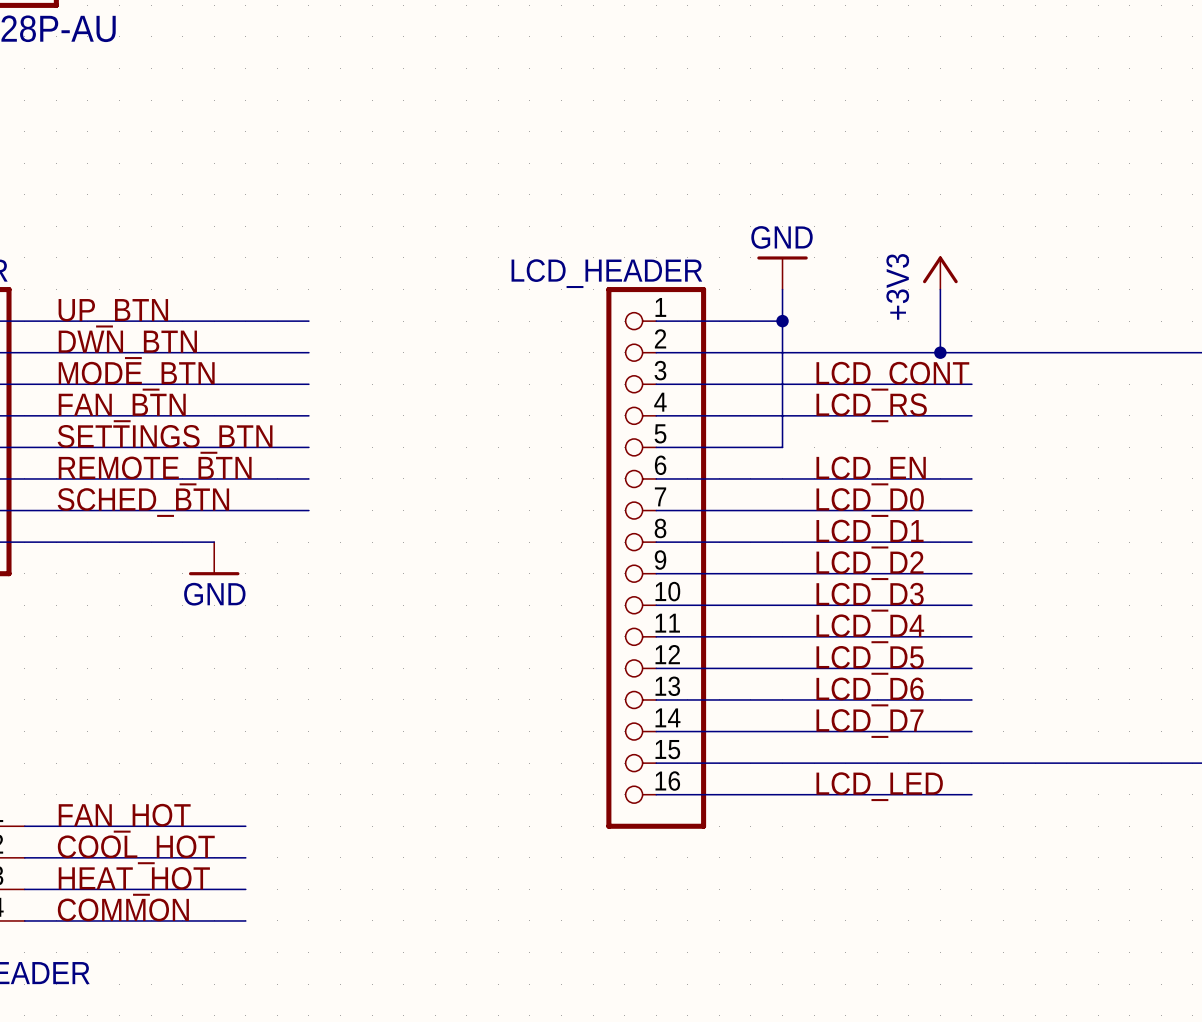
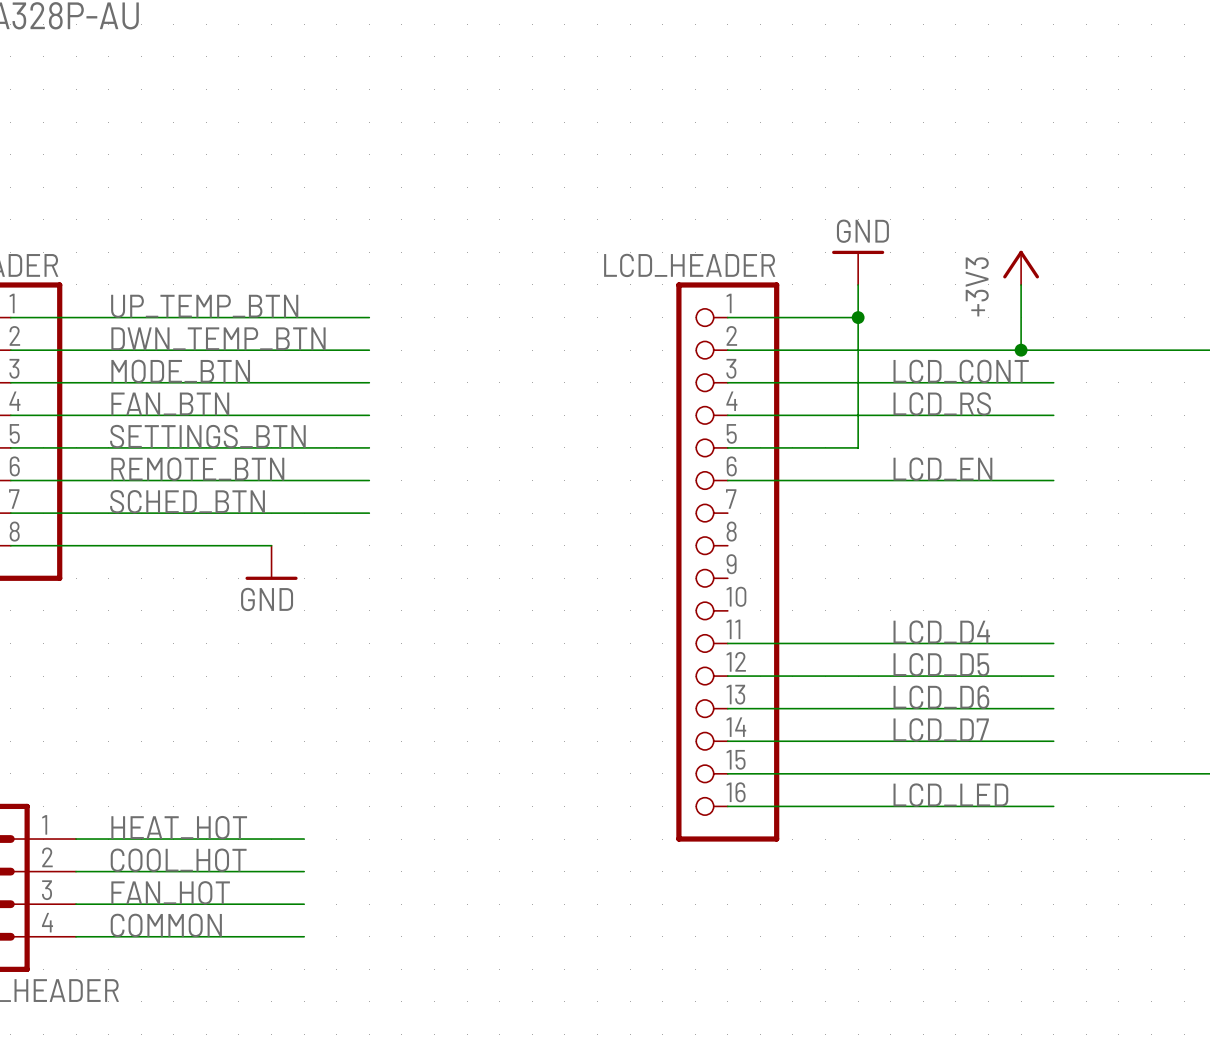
label: UP_BTN (113, 313) -> UP_TEMP_BTN (204, 306)
label: DWN_BTN (127, 344) -> DWN_TEMP_BTN (218, 338)
label: LCD_D0 (870, 502) -> none
wire: (656, 510) (971, 510) -> none
label: LCD_D1 (870, 534) -> none
wire: (656, 542) (971, 542) -> none
label: LCD_D2 (869, 565) -> none
wire: (656, 573) (971, 573) -> none
label: LCD_D3 (870, 597) -> none
wire: (656, 605) (971, 605) -> none
label: FAN_HOT (124, 818) -> HEAT_HOT (179, 827)
label: HEAT_HOT (134, 881) -> FAN_HOT (170, 892)

